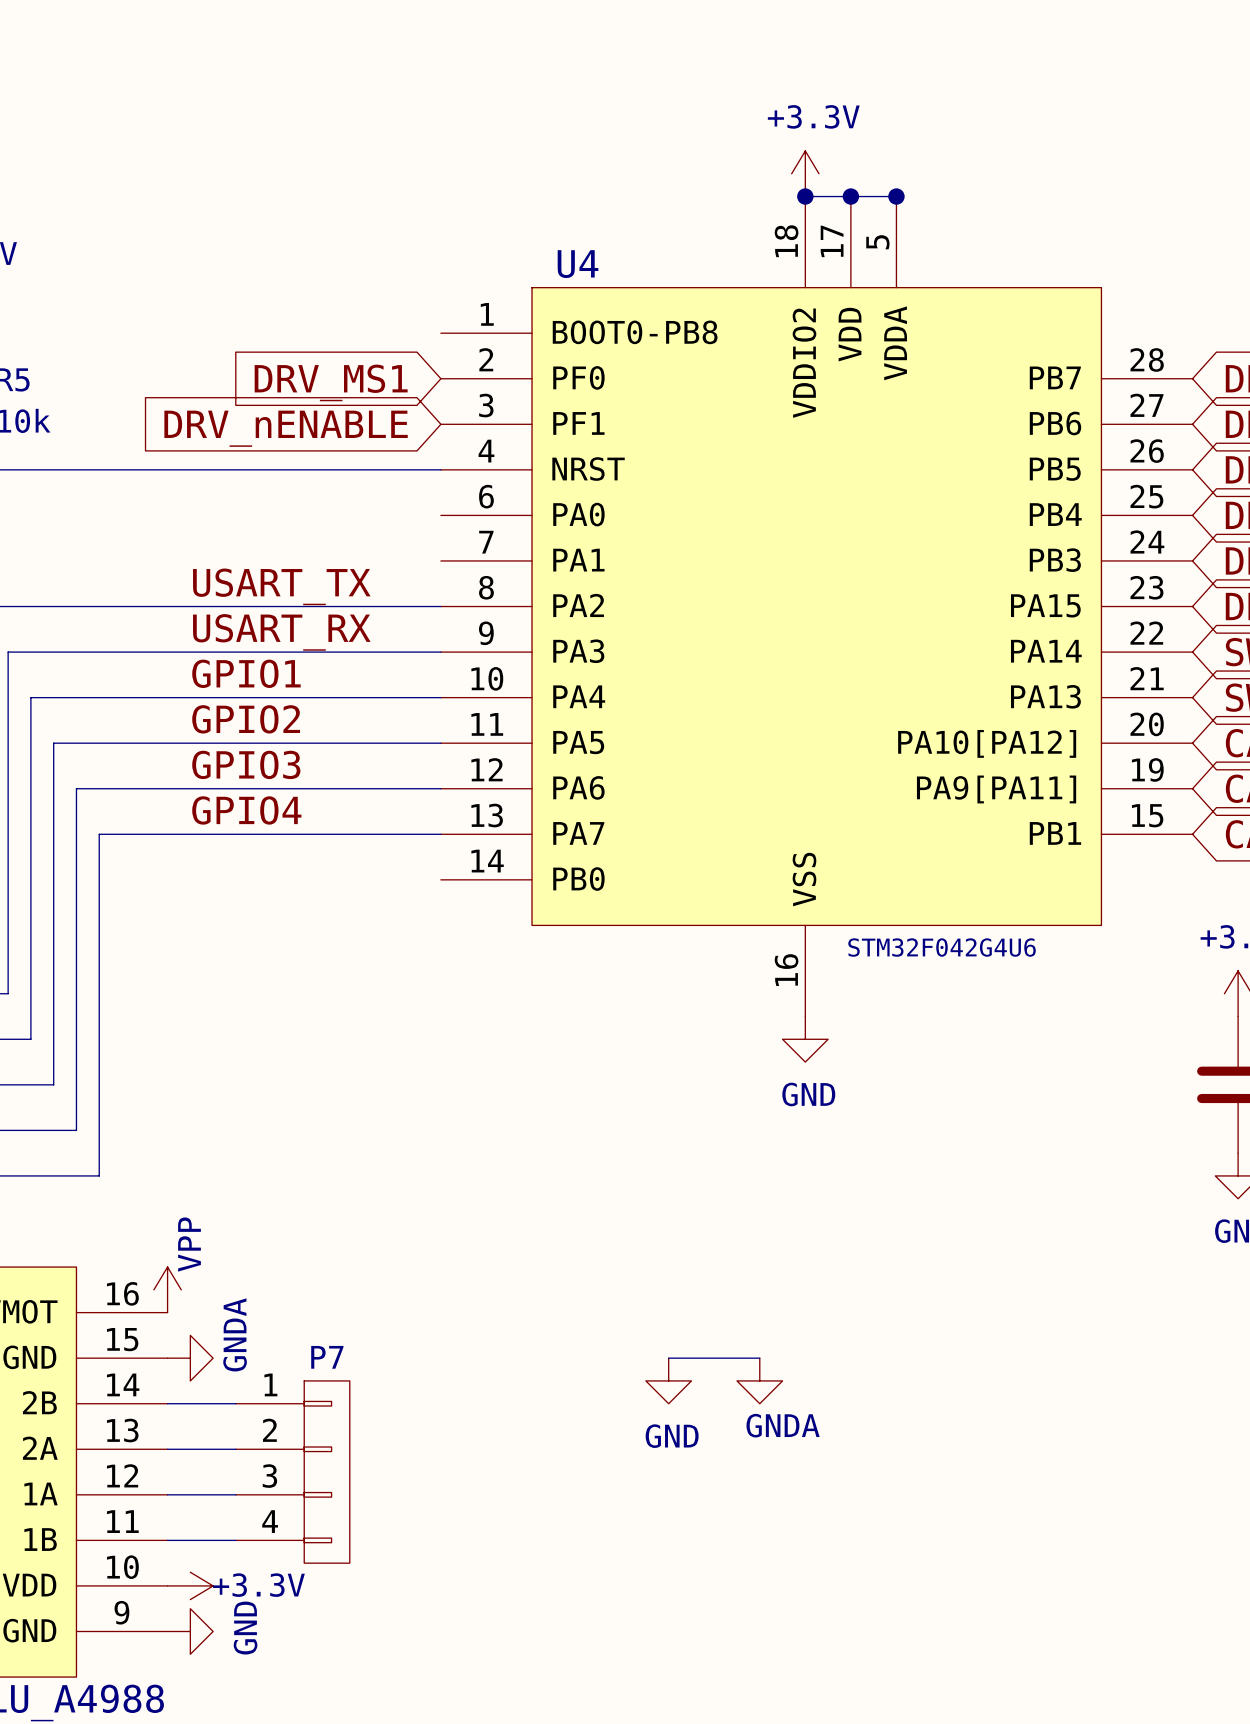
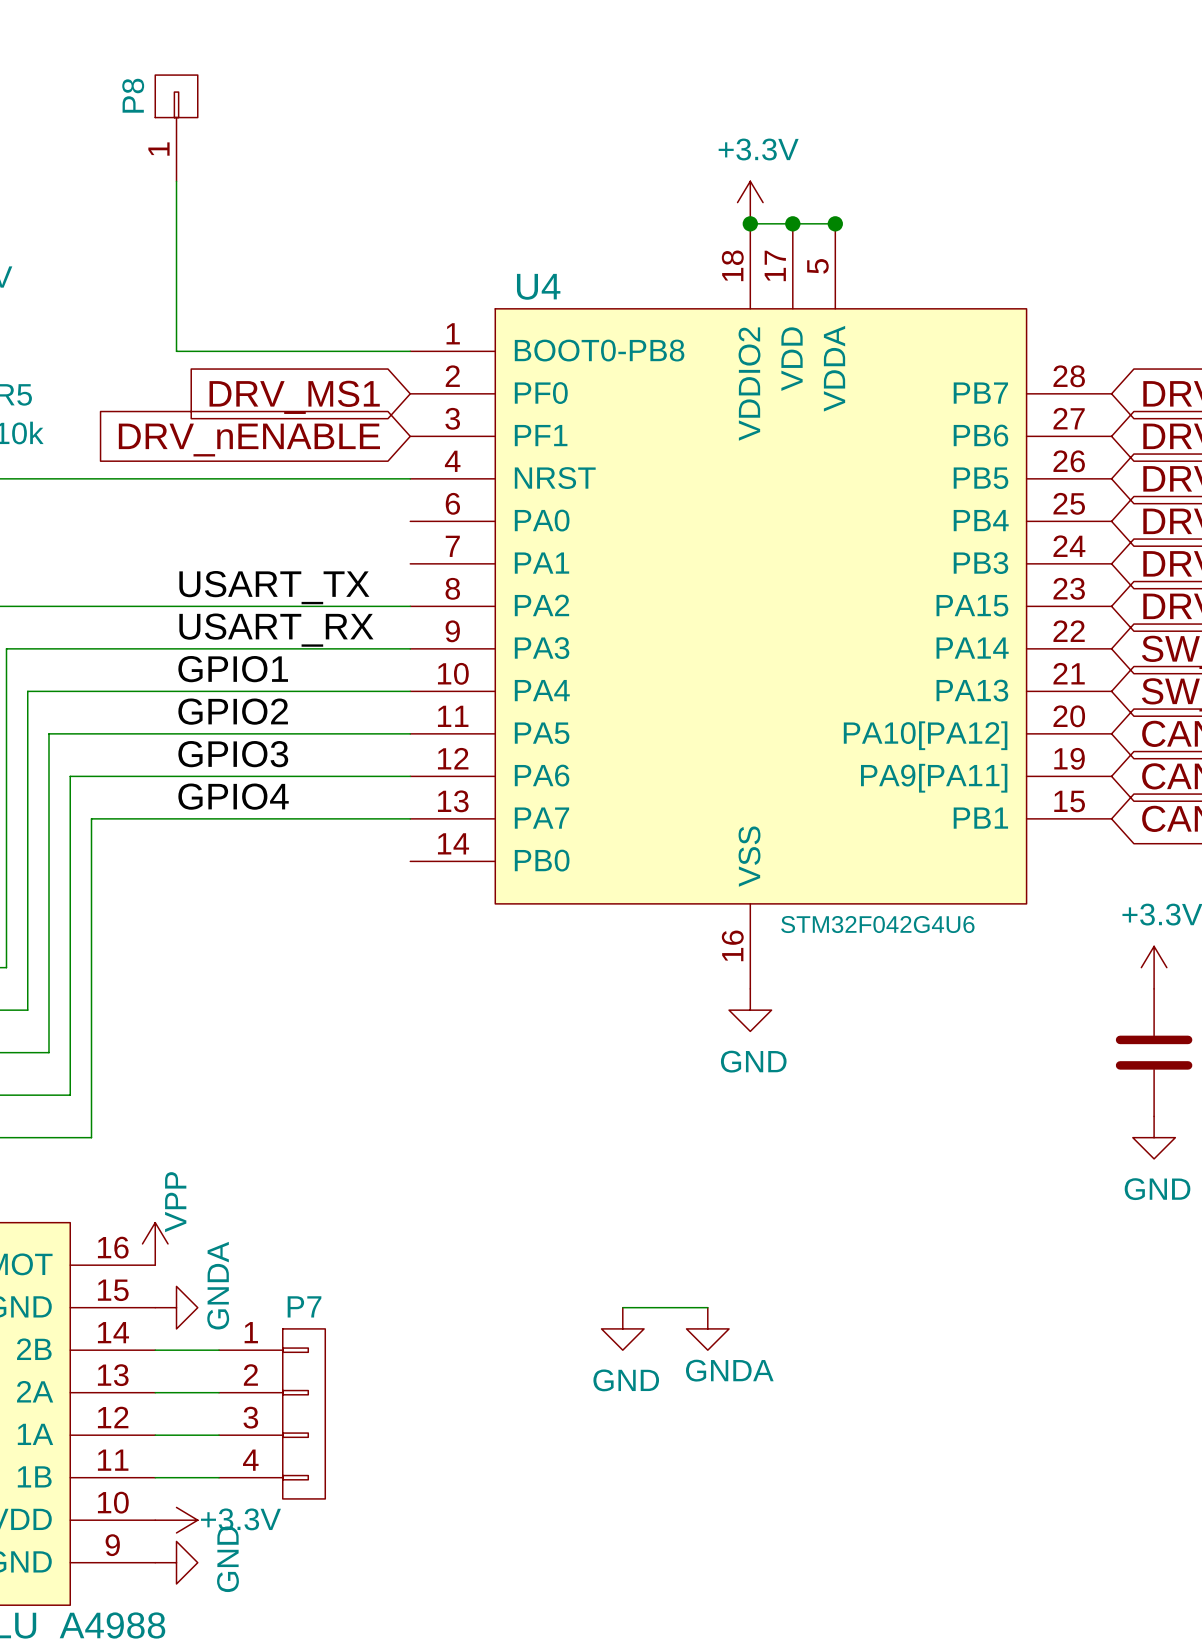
P8: none -> (176, 128)
wire: none -> (176, 181) (176, 351) (410, 351)

